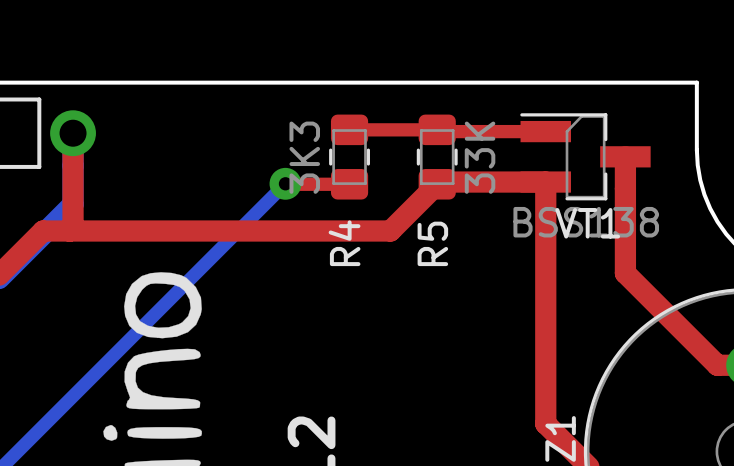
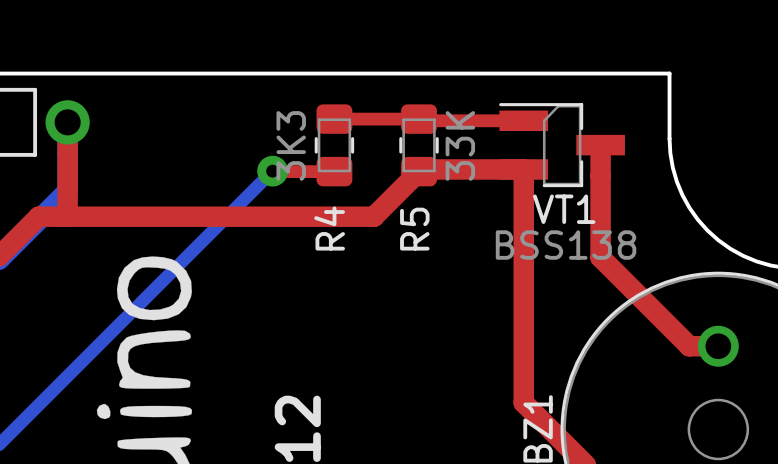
VT1 value position: BSS138 (586, 222) -> BSS138 (566, 245)

